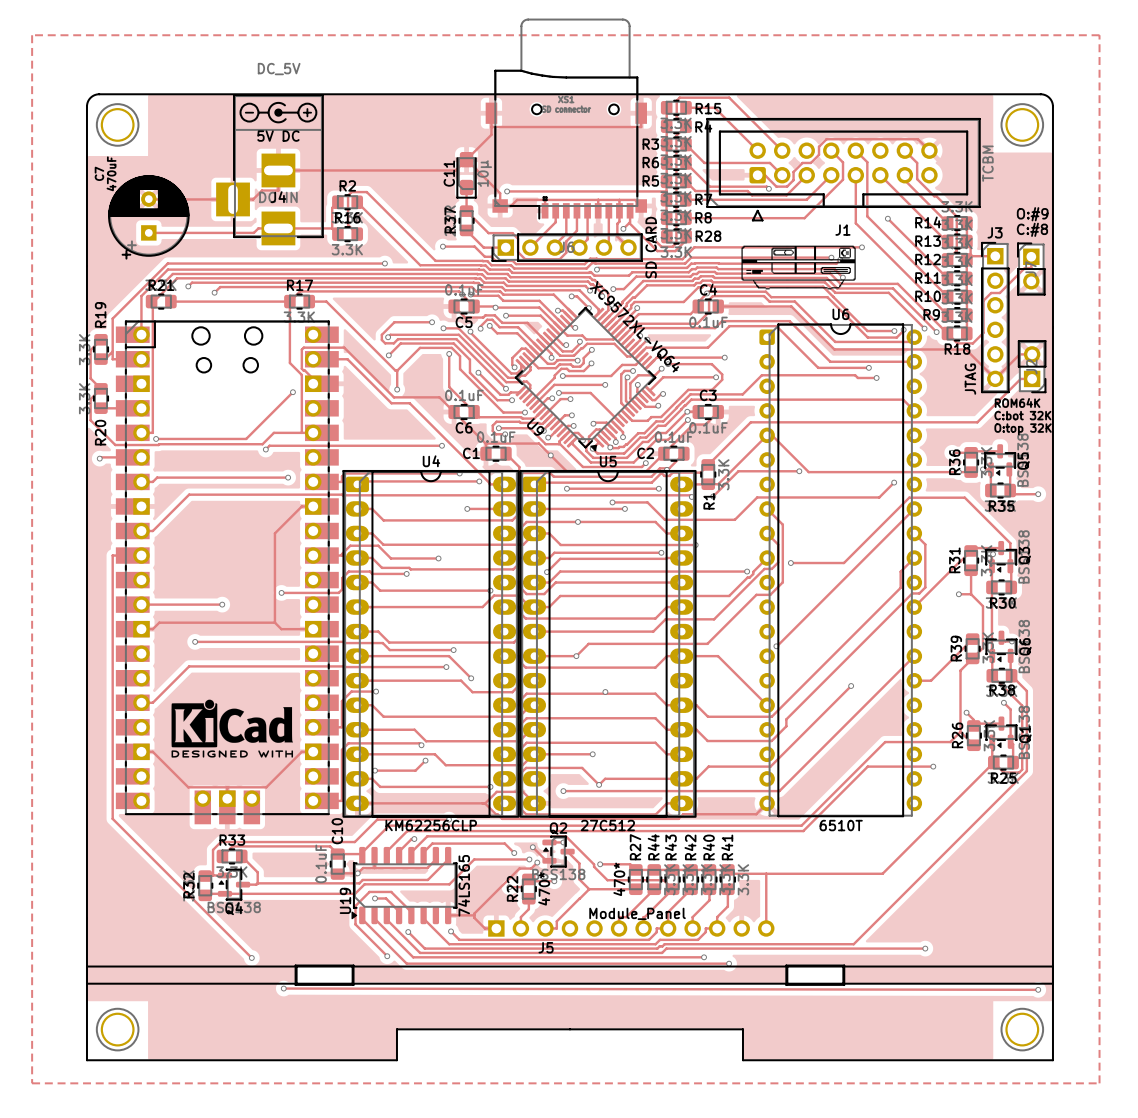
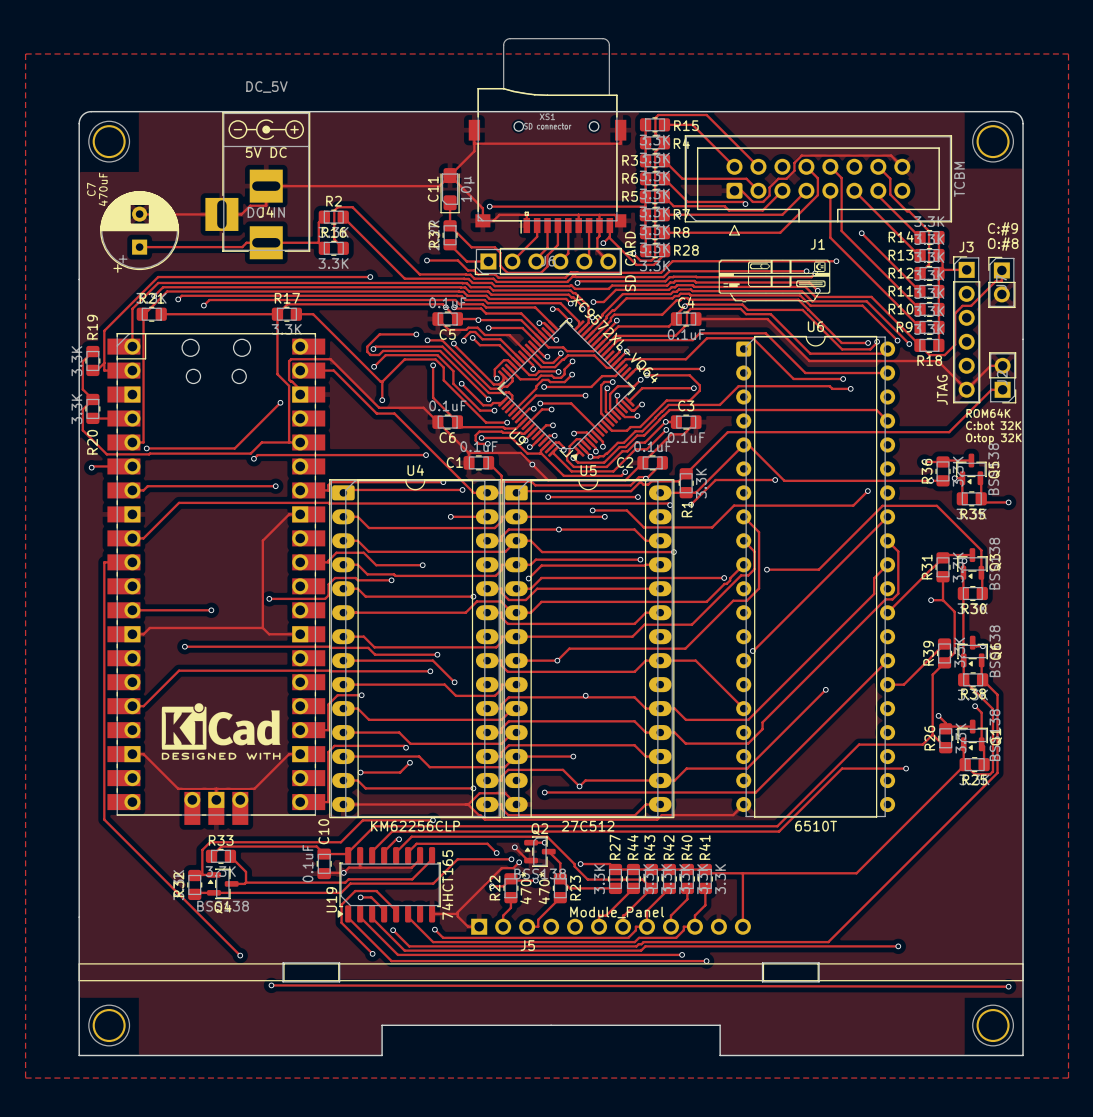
text: O:#9 (1032, 214) -> C:#9 (1002, 228)
text: C:#8 (1032, 229) -> O:#8 (1003, 244)
R27 value: 470* (619, 879) -> 3.3K (599, 879)
U19 value: 74LS165 (464, 885) -> 74HCT165 (447, 885)
R23: none -> 470* (560, 888)
track: (589, 889) (579, 898) -> none

